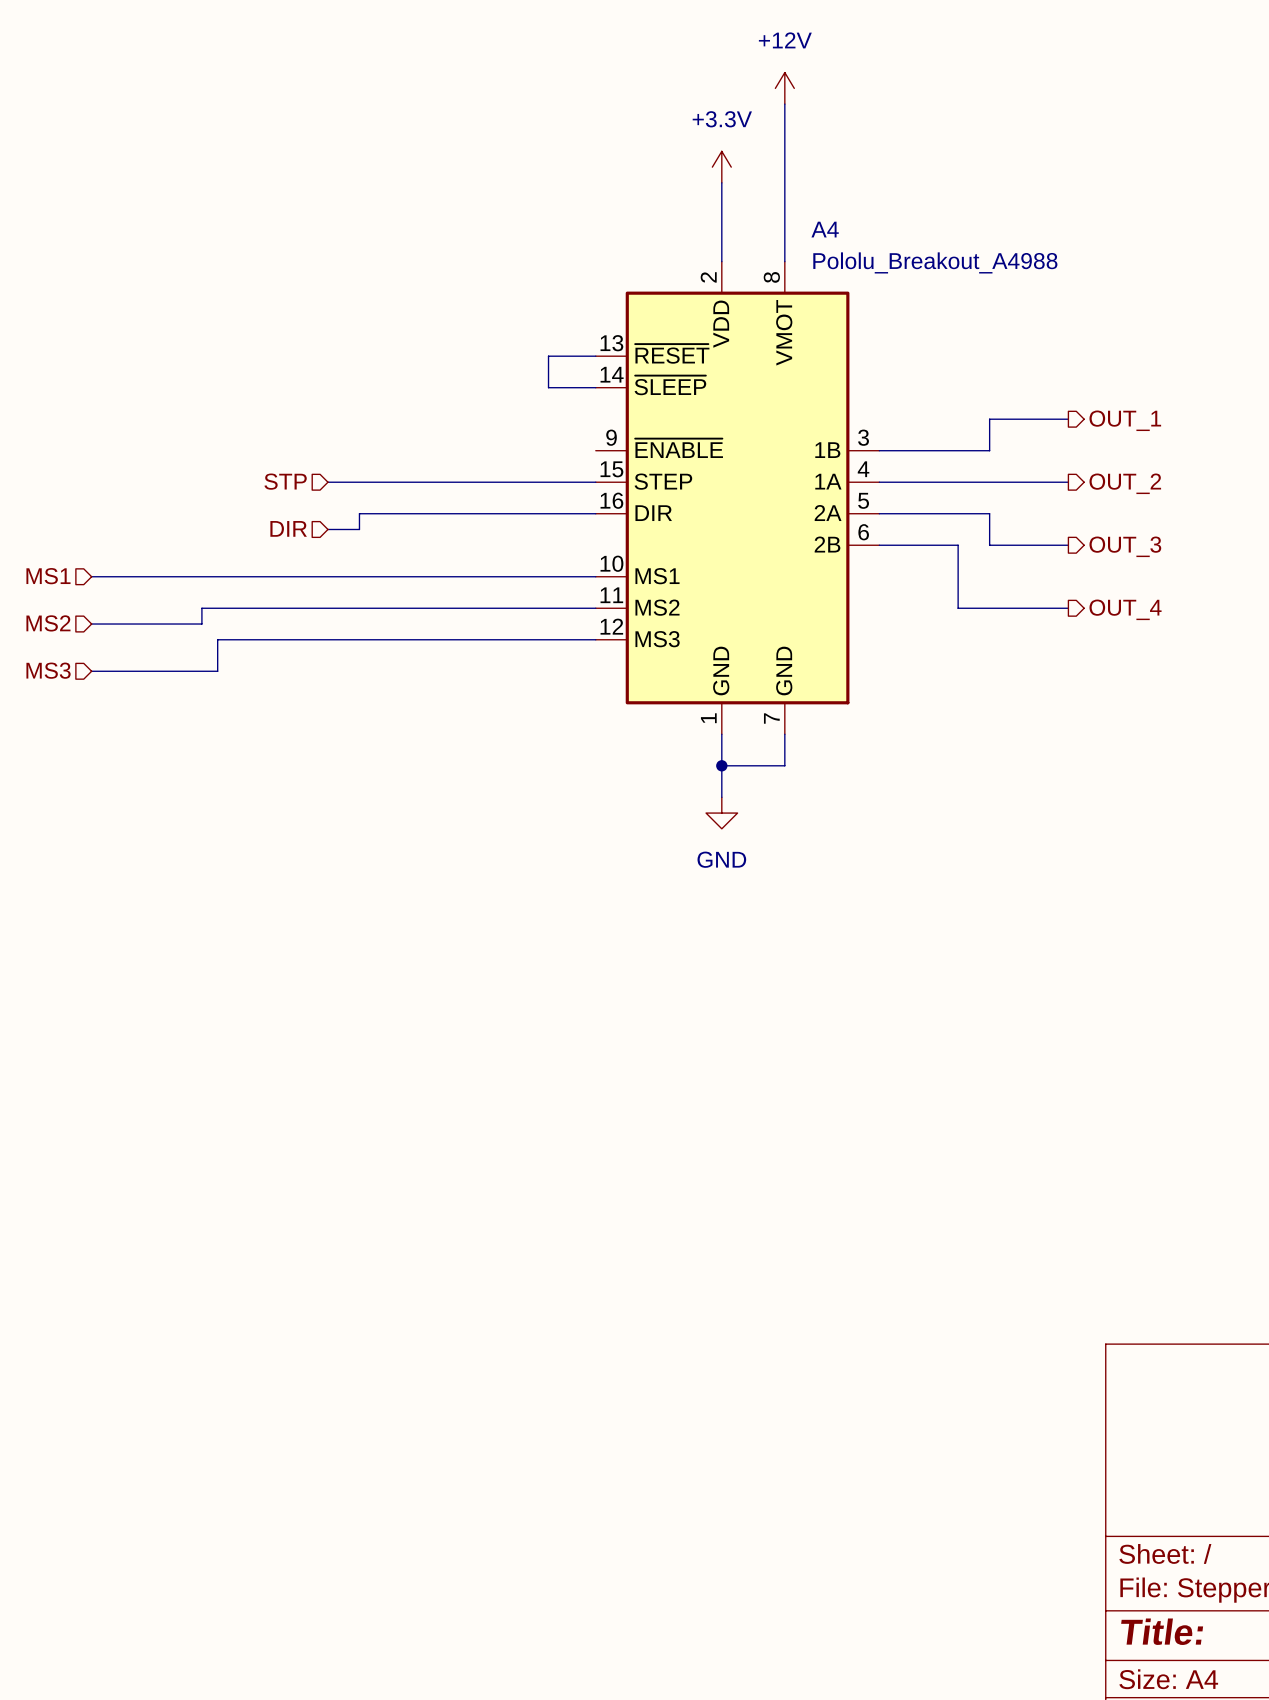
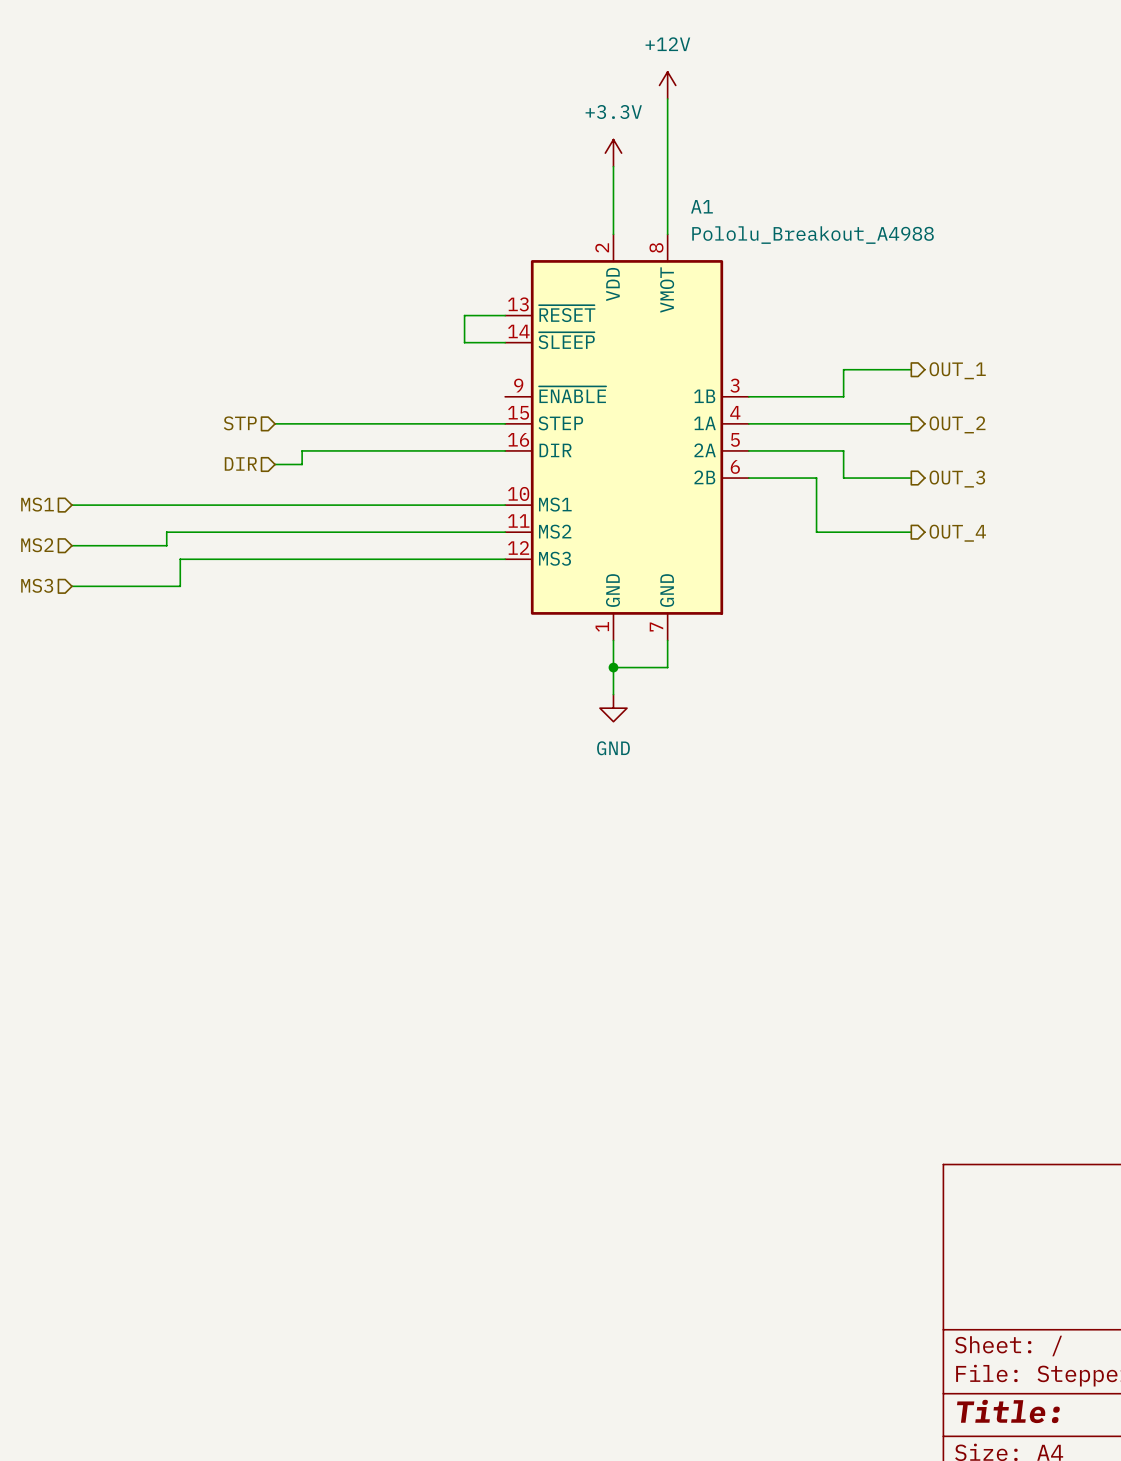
A4 name: A4 (825, 229) -> A1 (701, 206)

